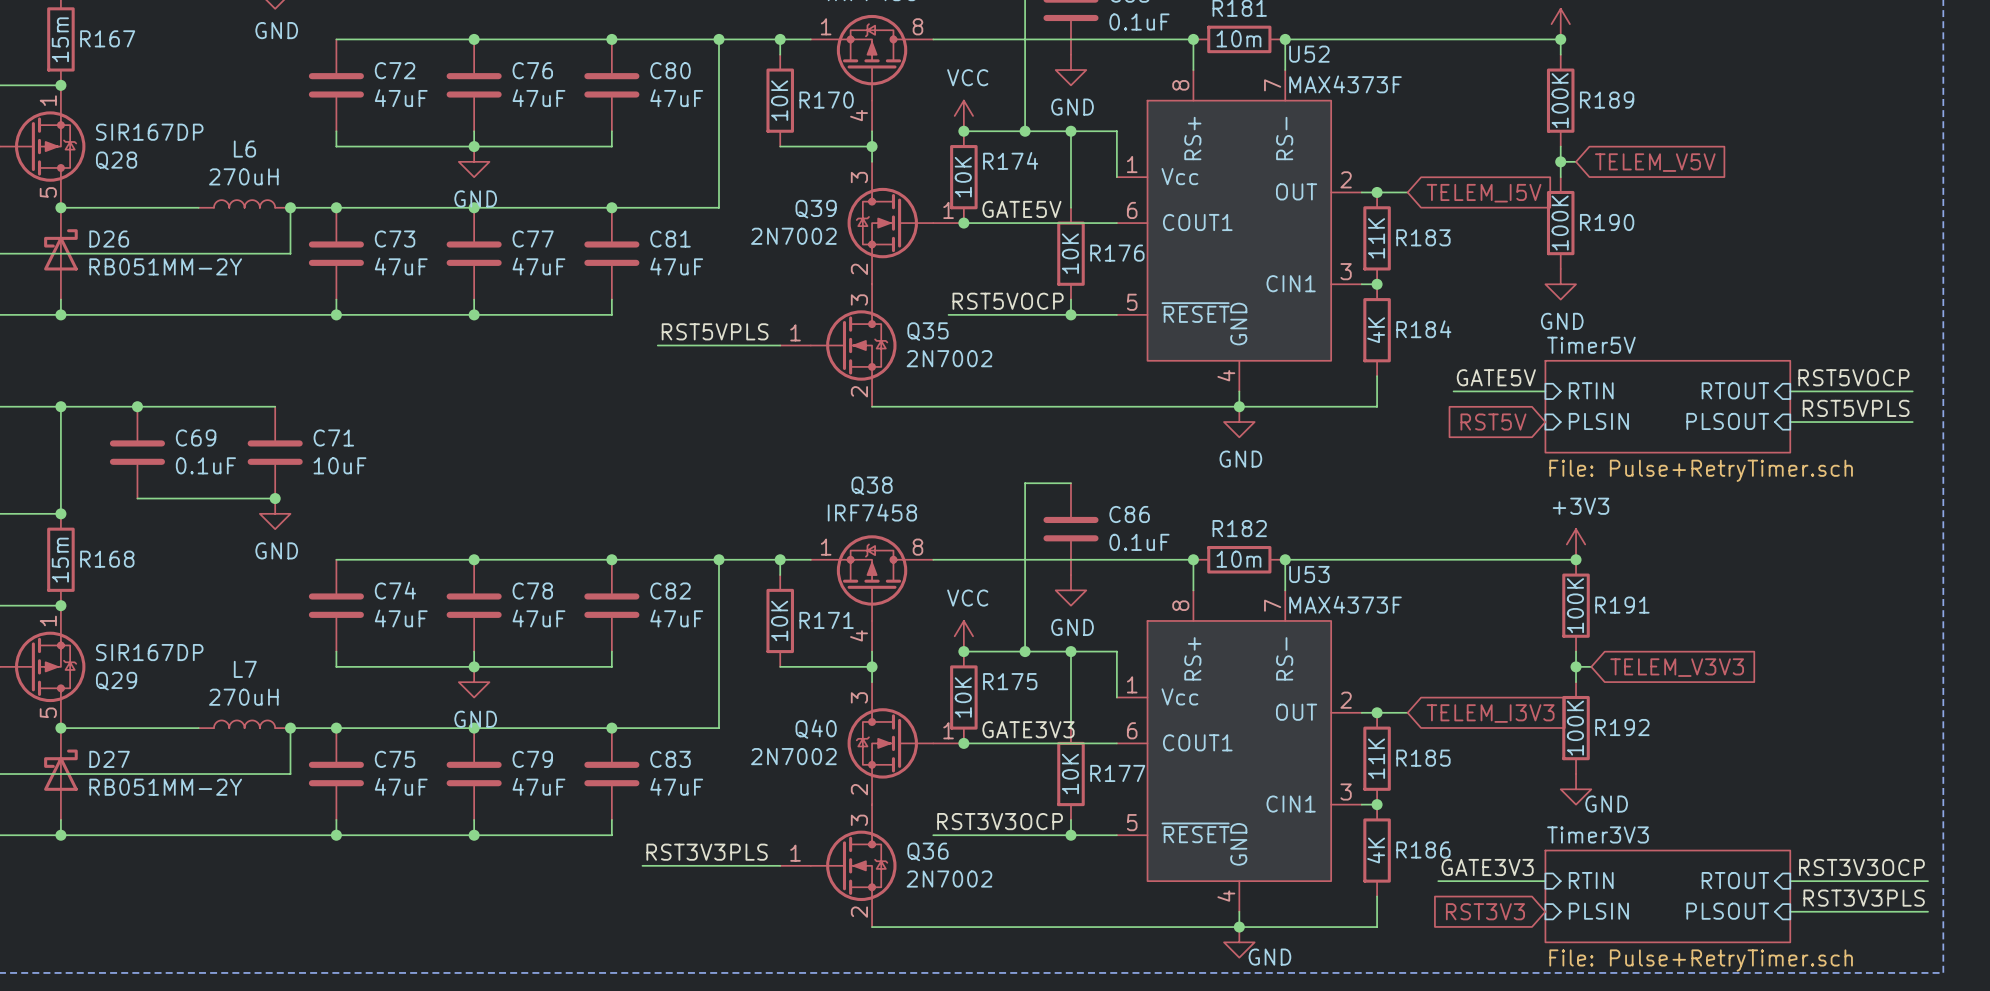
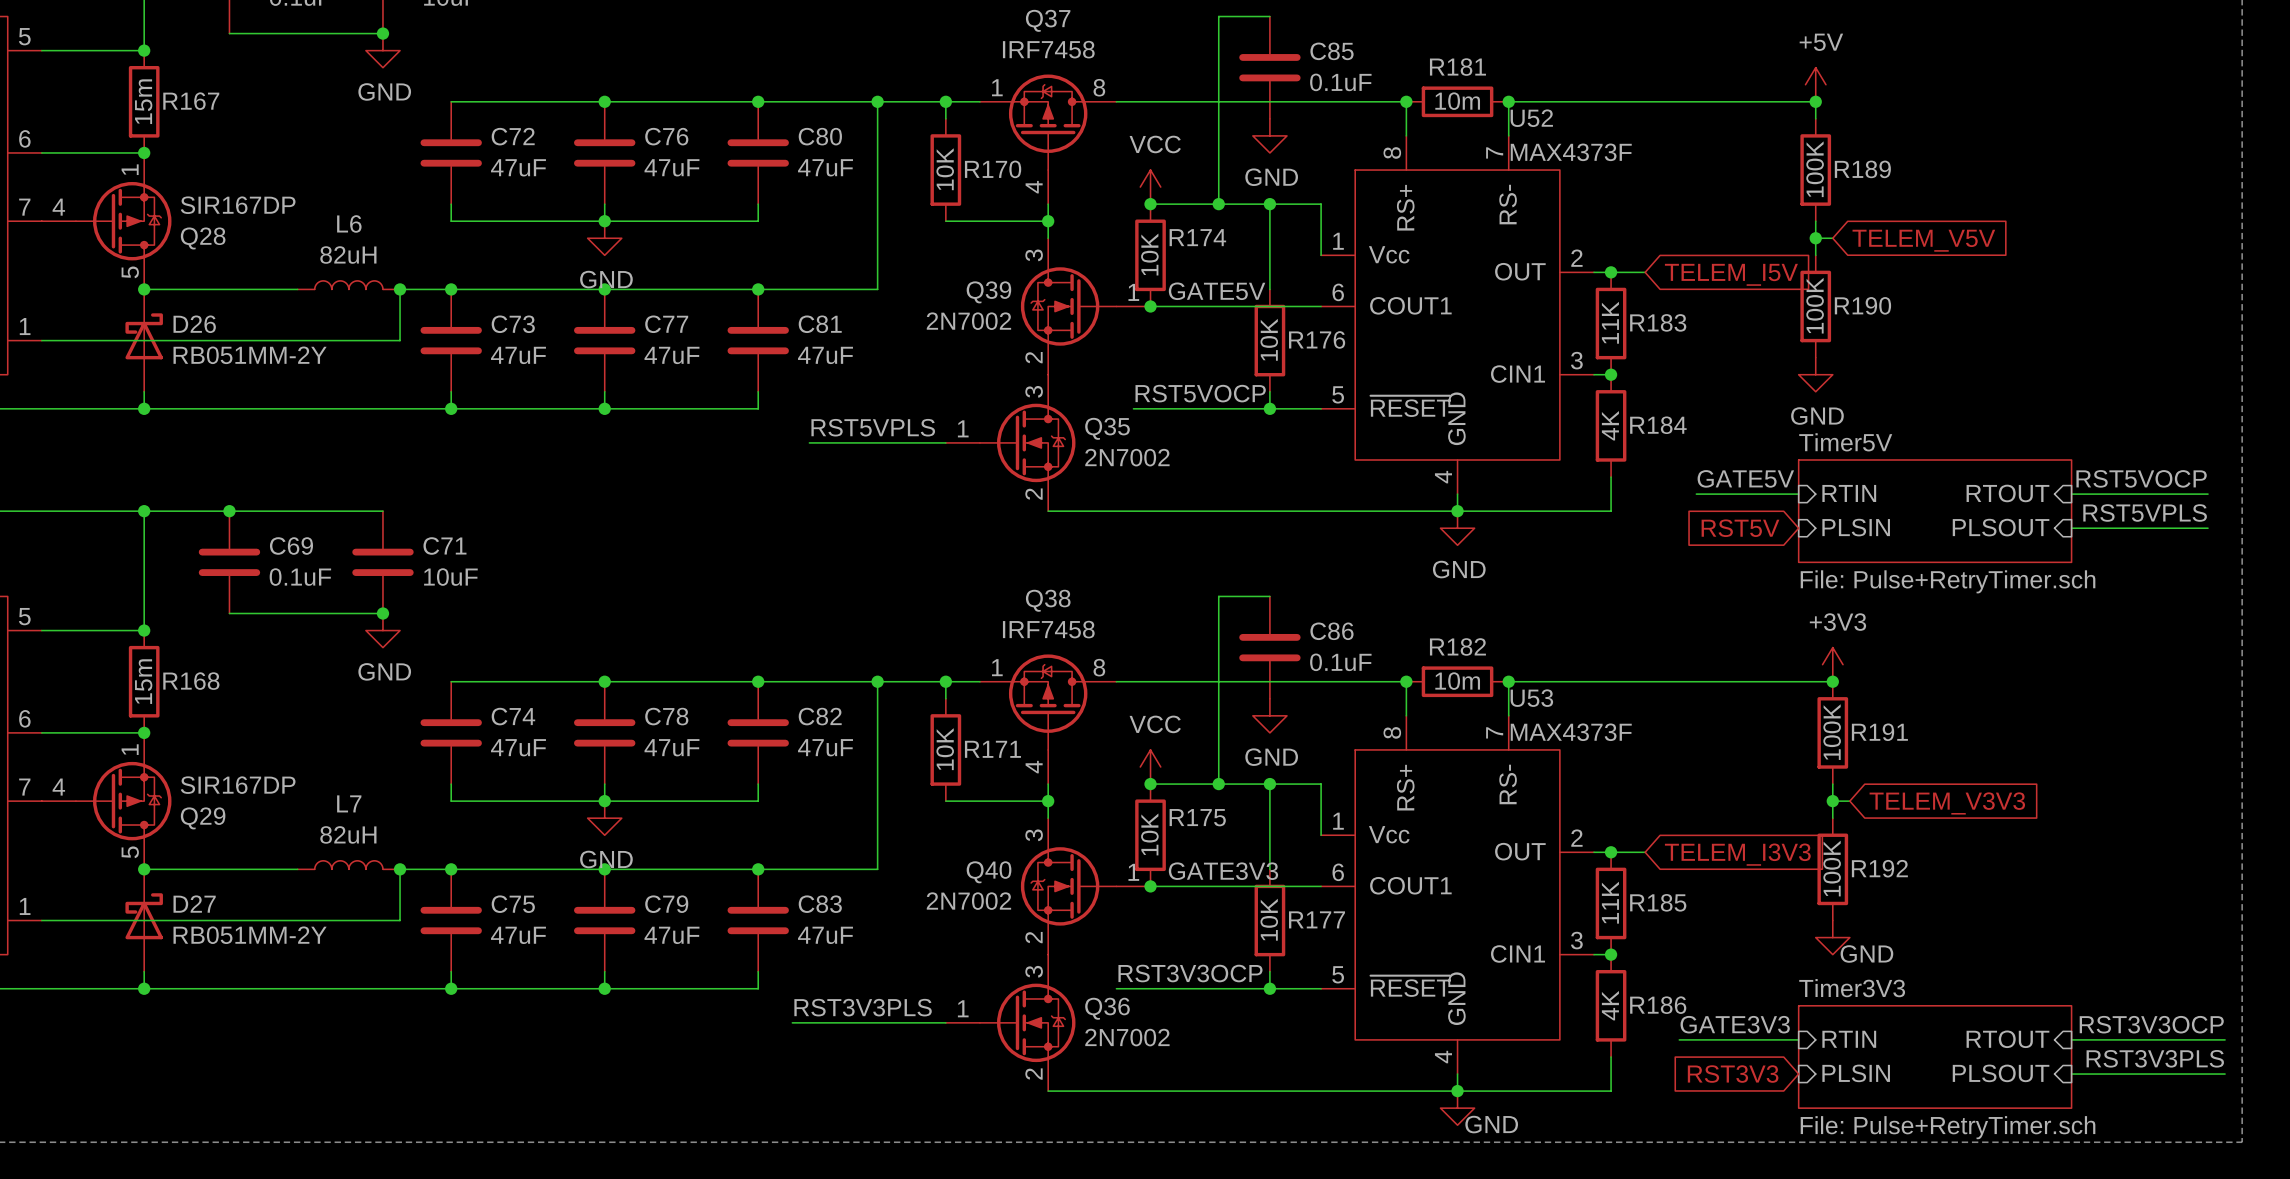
L6 value: 270uH (243, 176) -> 82uH (348, 255)
L7 value: 270uH (243, 697) -> 82uH (348, 834)

